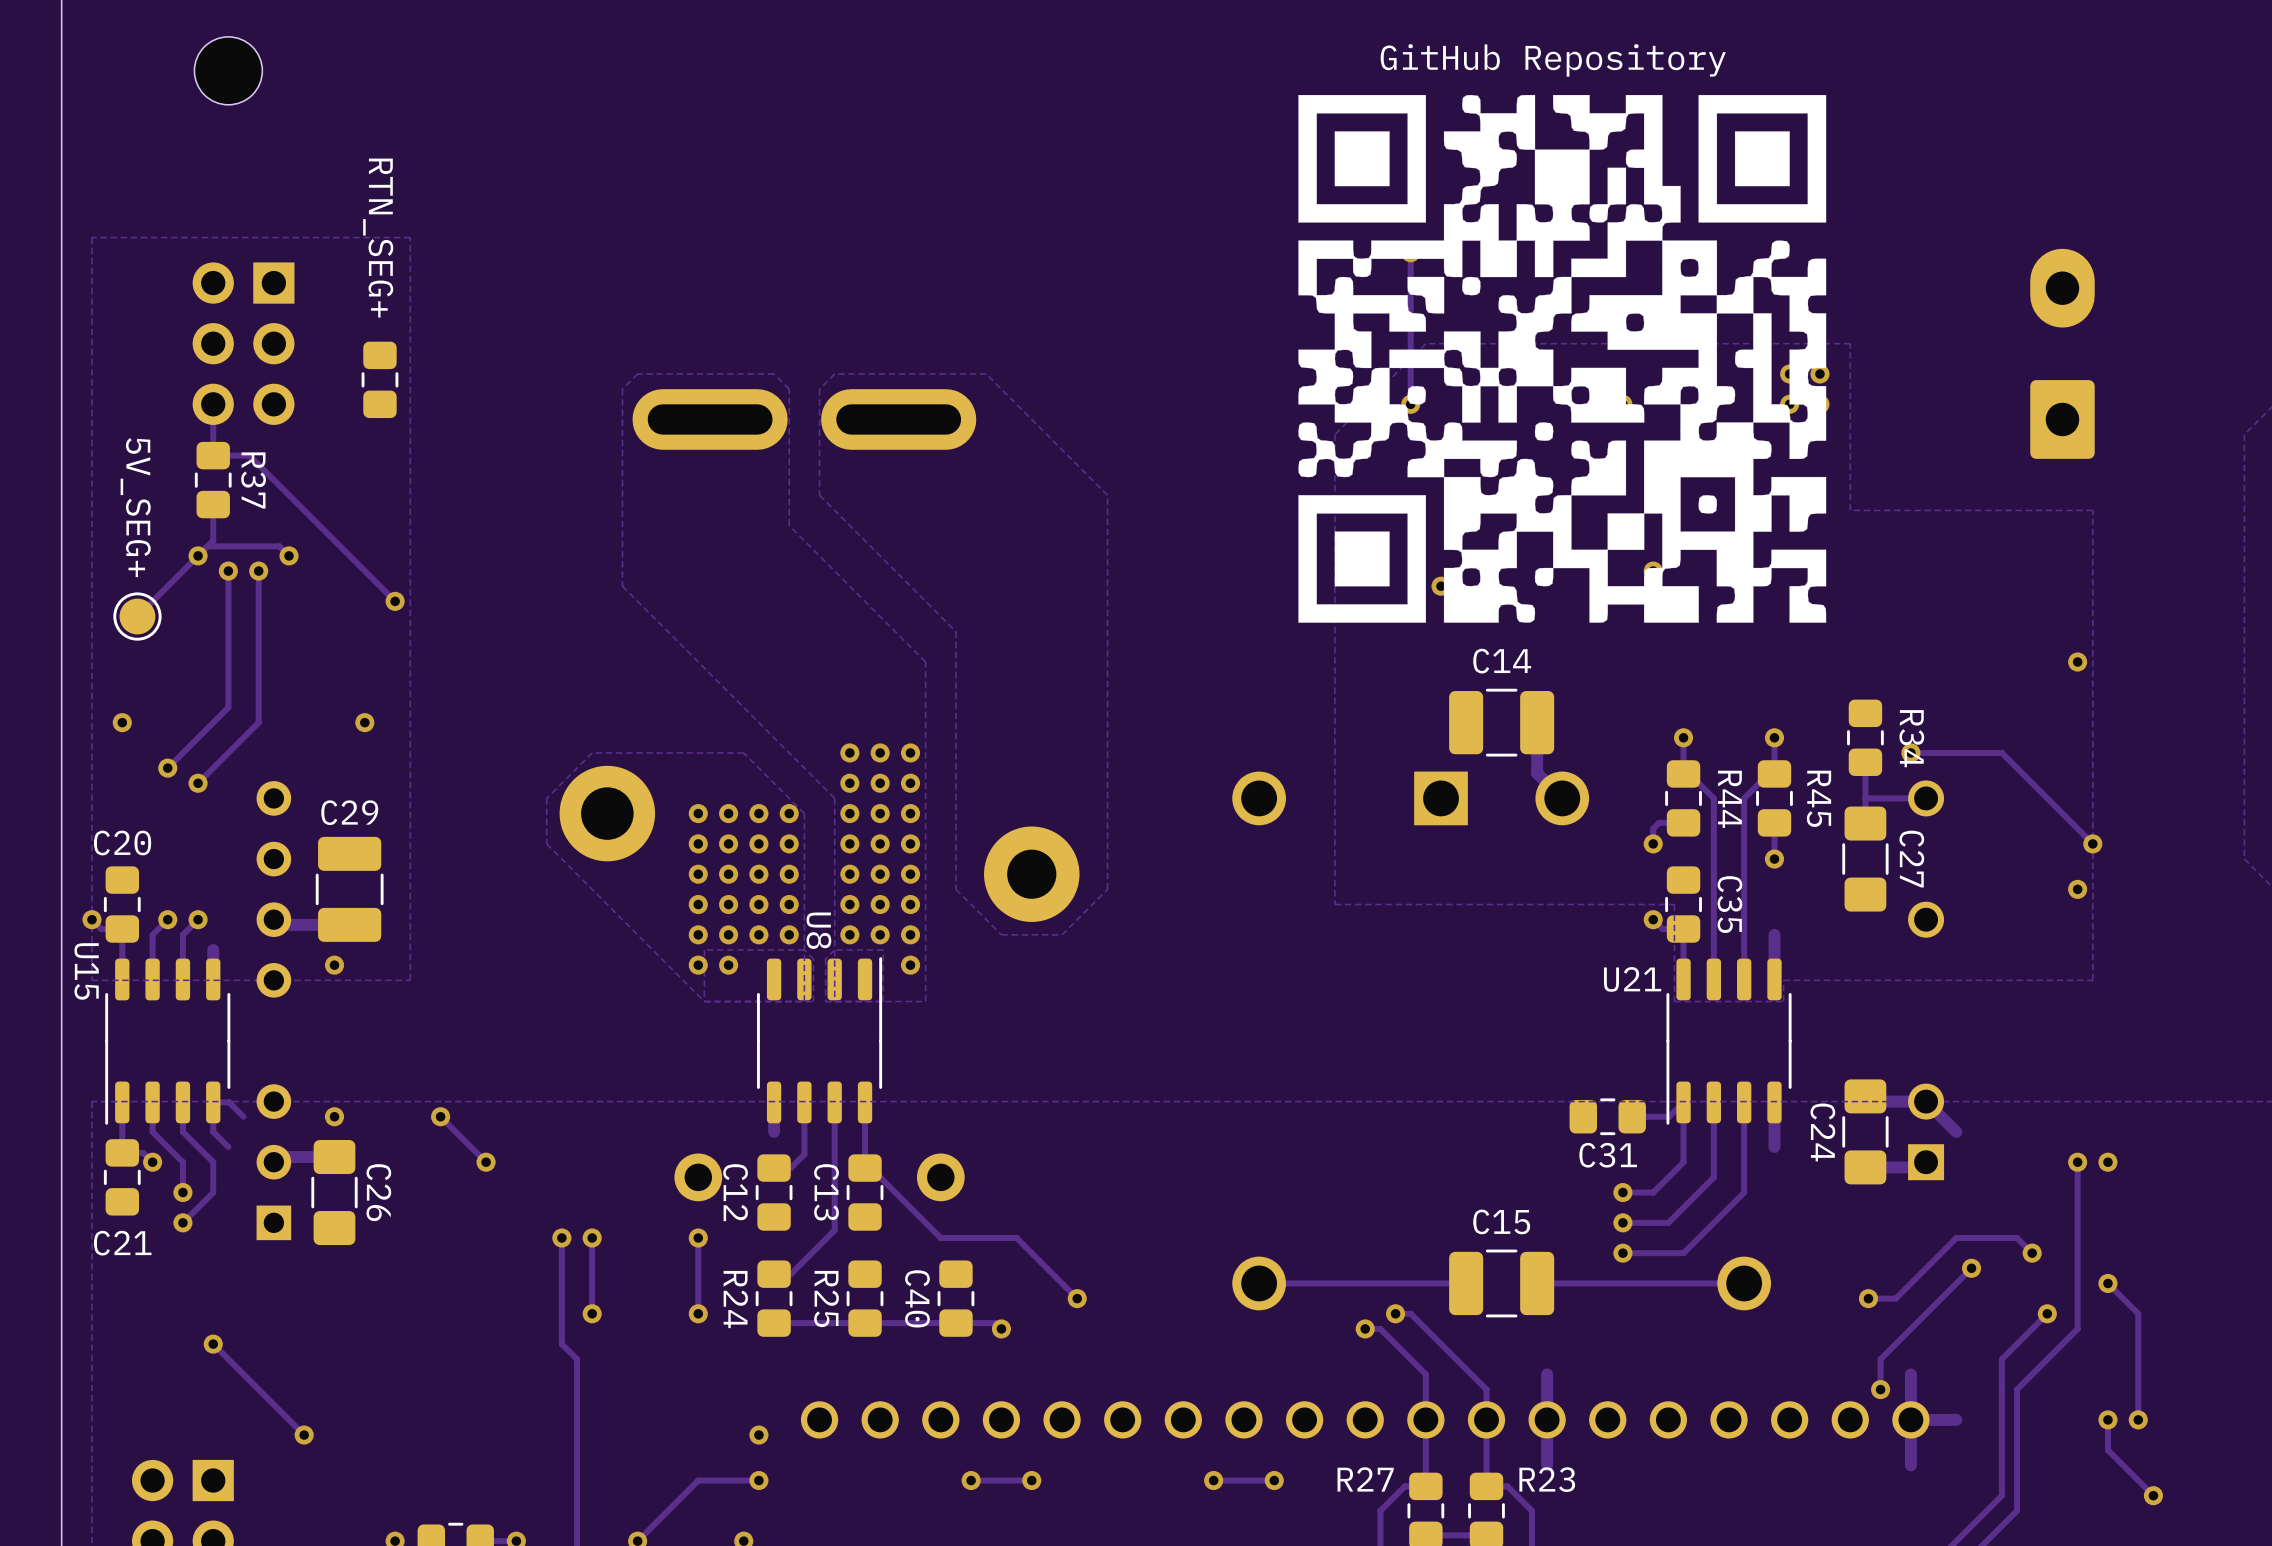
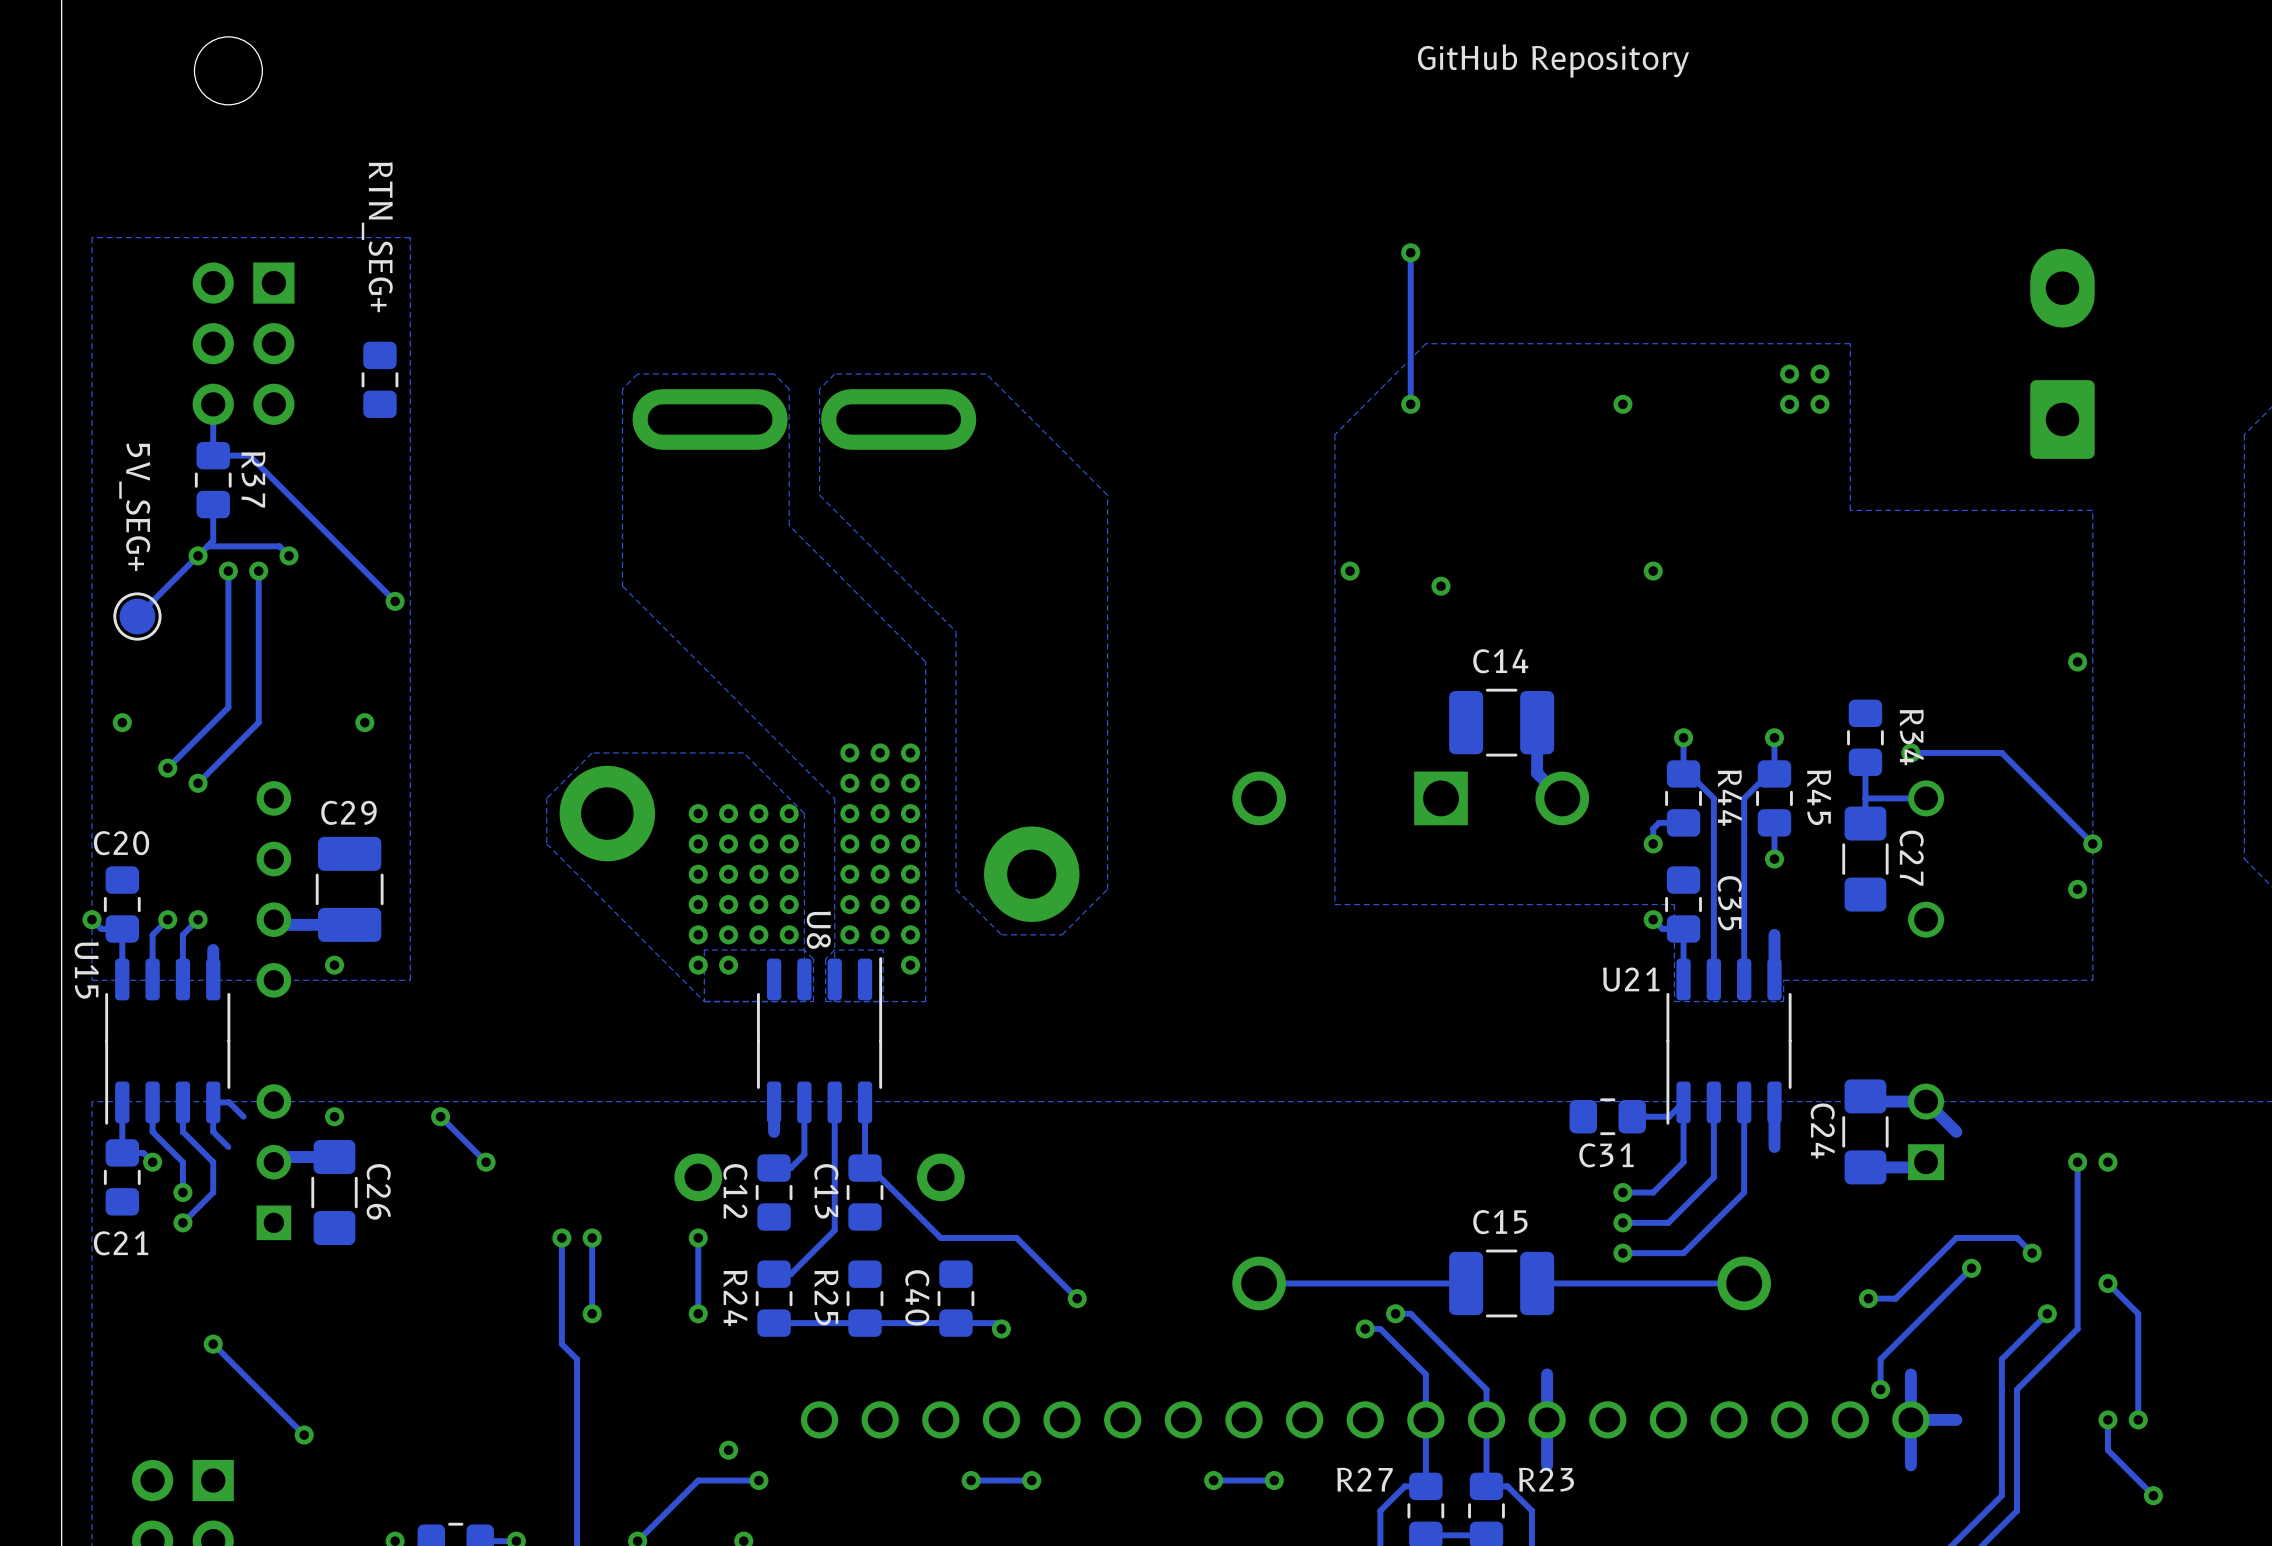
drawing: [1298, 94, 1827, 623] -> none
via position: (758, 1435) -> (728, 1450)

